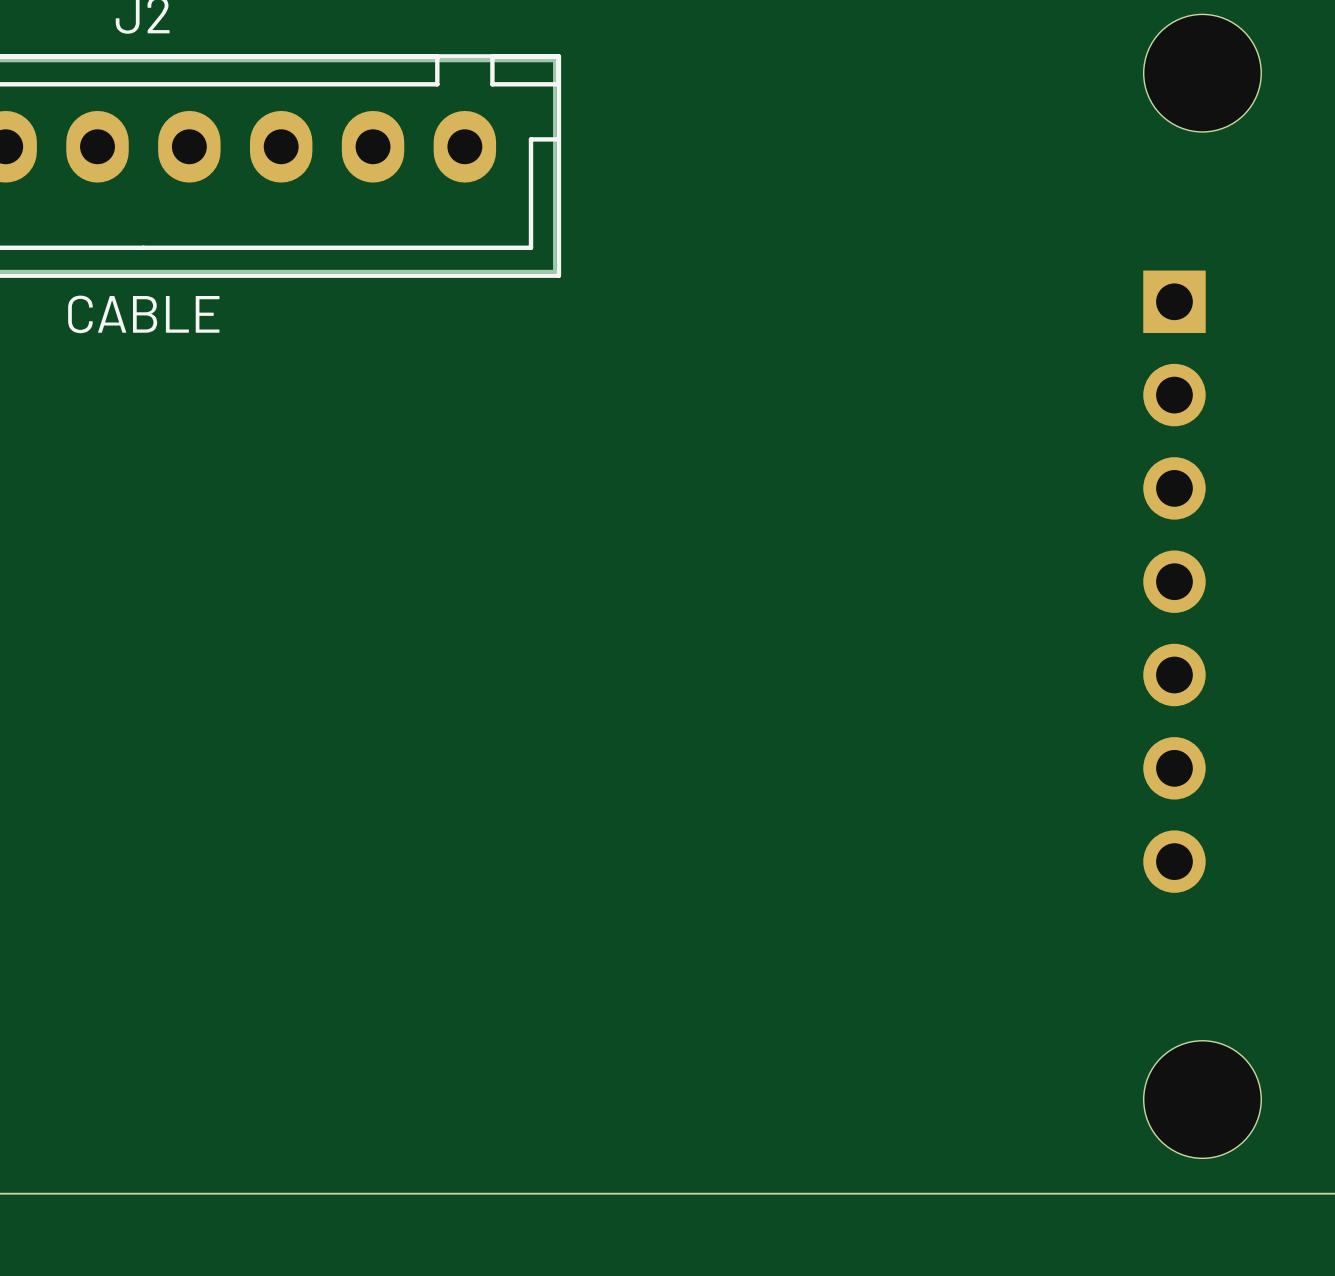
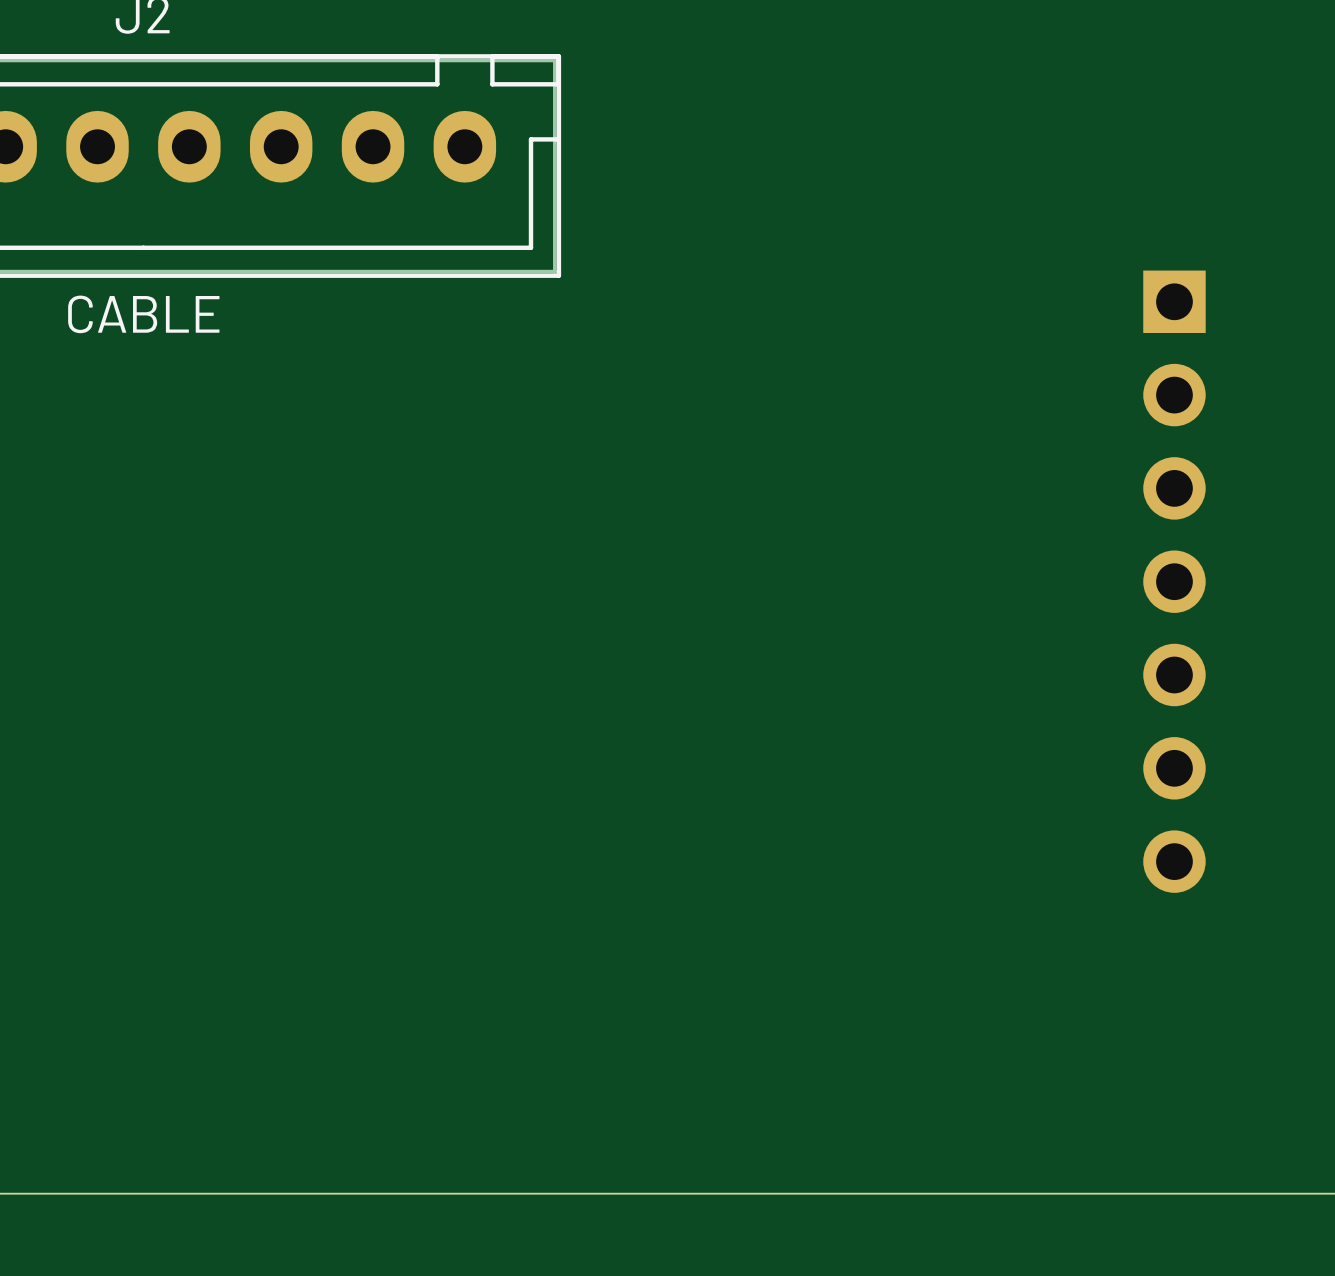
part: (1202, 73) -> none
part: (1202, 1099) -> none

